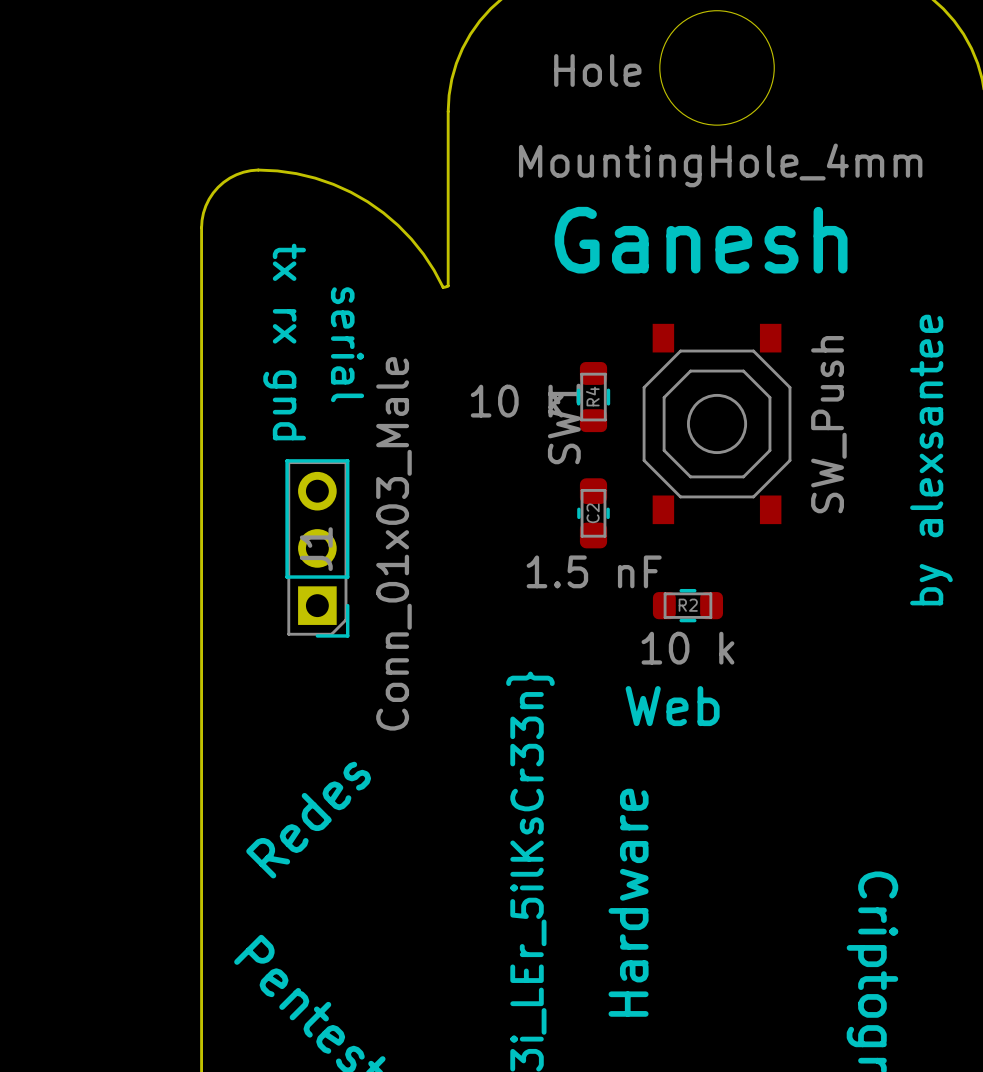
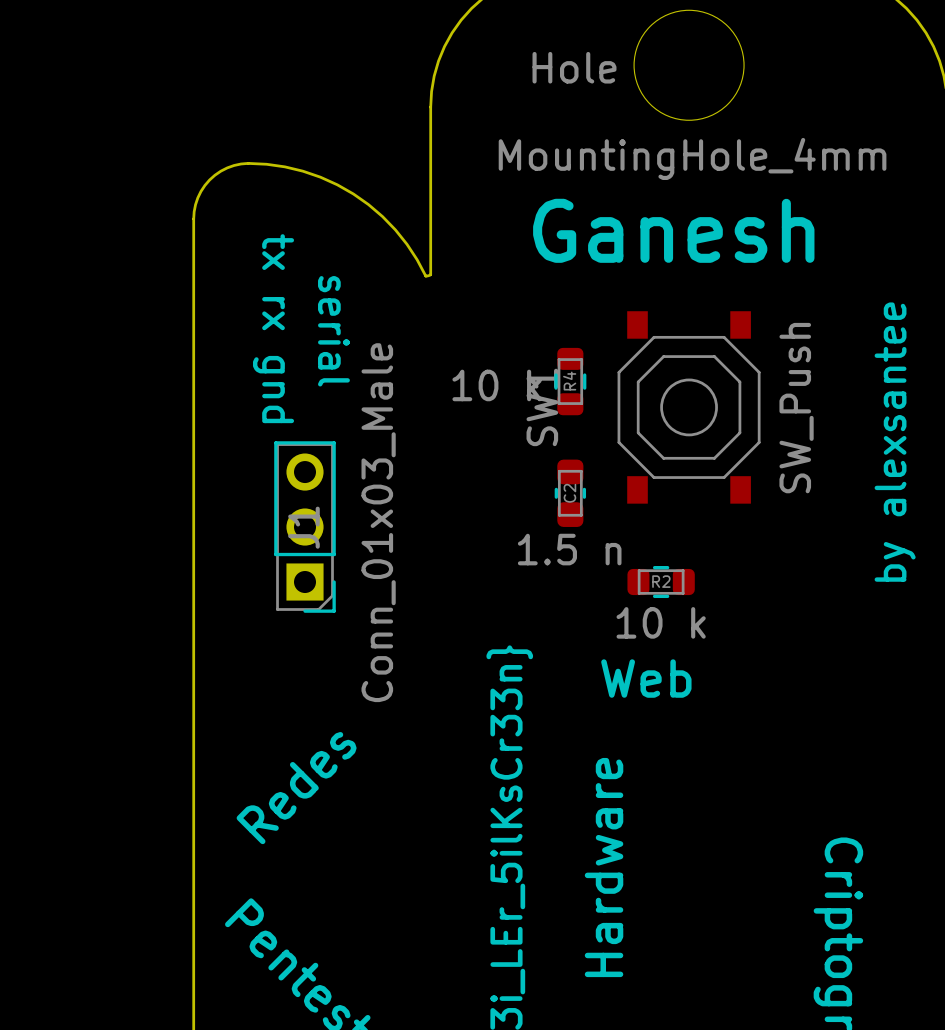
C2 value: 1.5 nF (594, 571) -> 1.5 n (569, 549)

